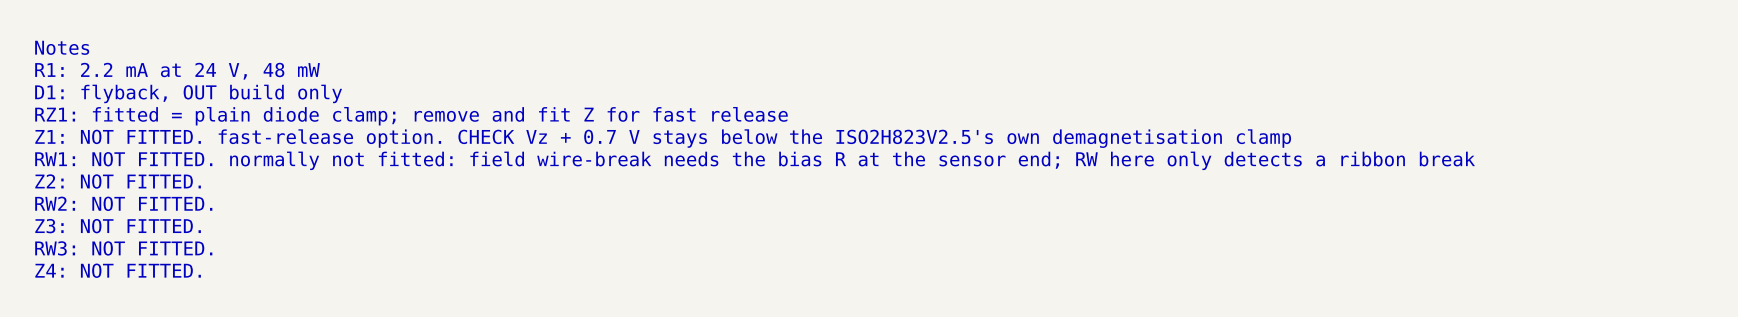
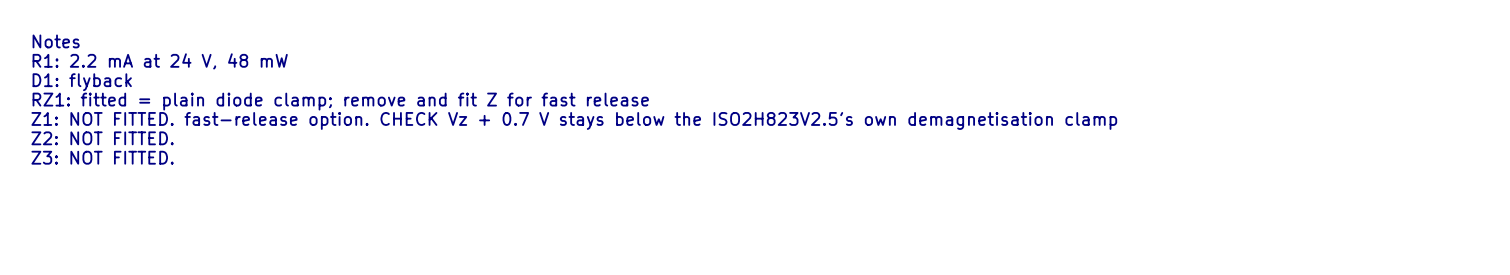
text: D1: flyback, OUT build only (188, 93) -> D1: flyback (82, 82)
text: RW1: NOT FITTED. normally not fitted: field wire-break needs the bias R at the sensor end; RW here only detects a ribbon break (755, 160) -> Z2: NOT FITTED. (102, 138)
text: Z2: NOT FITTED. (118, 181) -> Z3: NOT FITTED. (102, 157)
text: RW2: NOT FITTED. (123, 203) -> none
text: Z3: NOT FITTED. (118, 226) -> none
text: RW3: NOT FITTED. (123, 248) -> none
text: Z4: NOT FITTED. (118, 270) -> none

